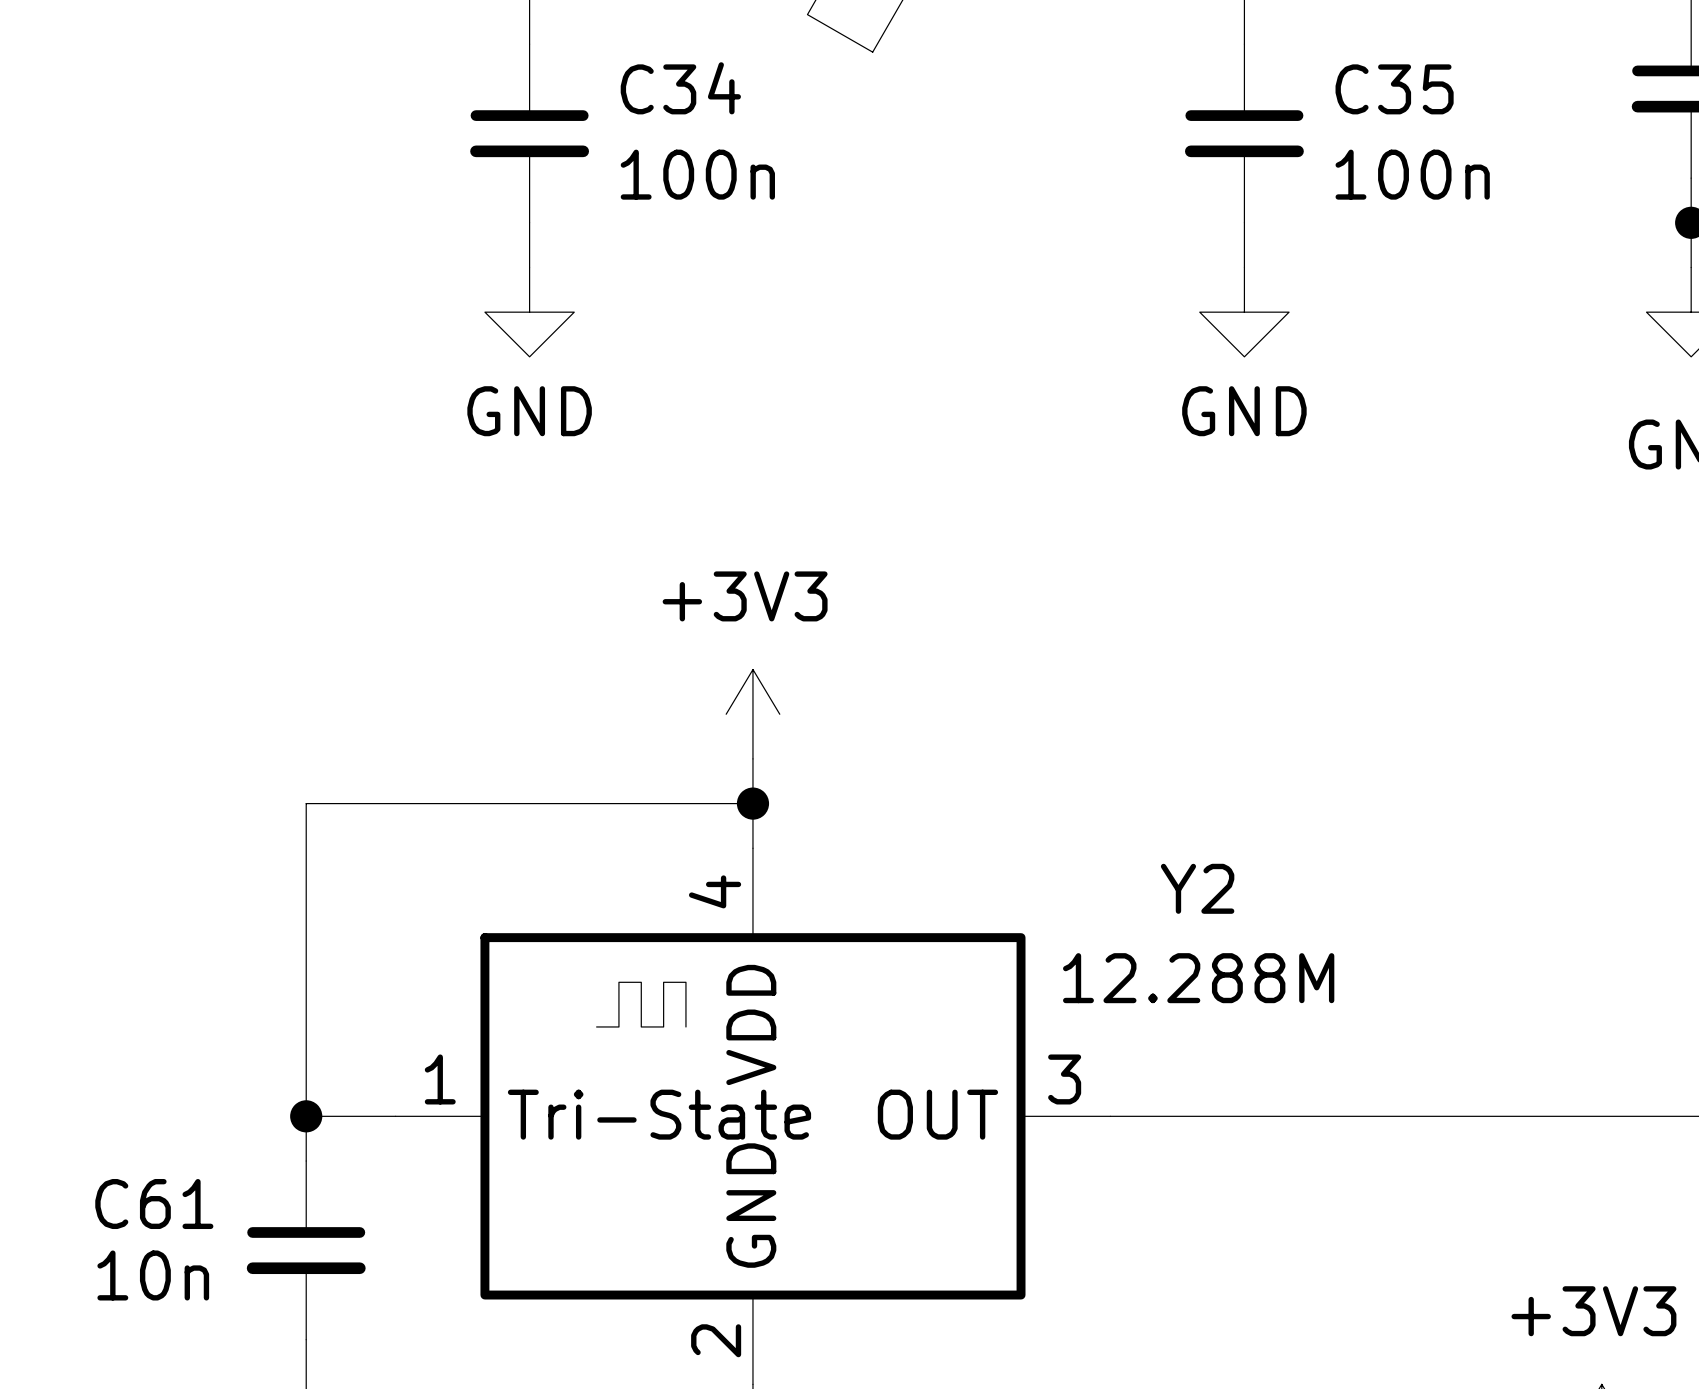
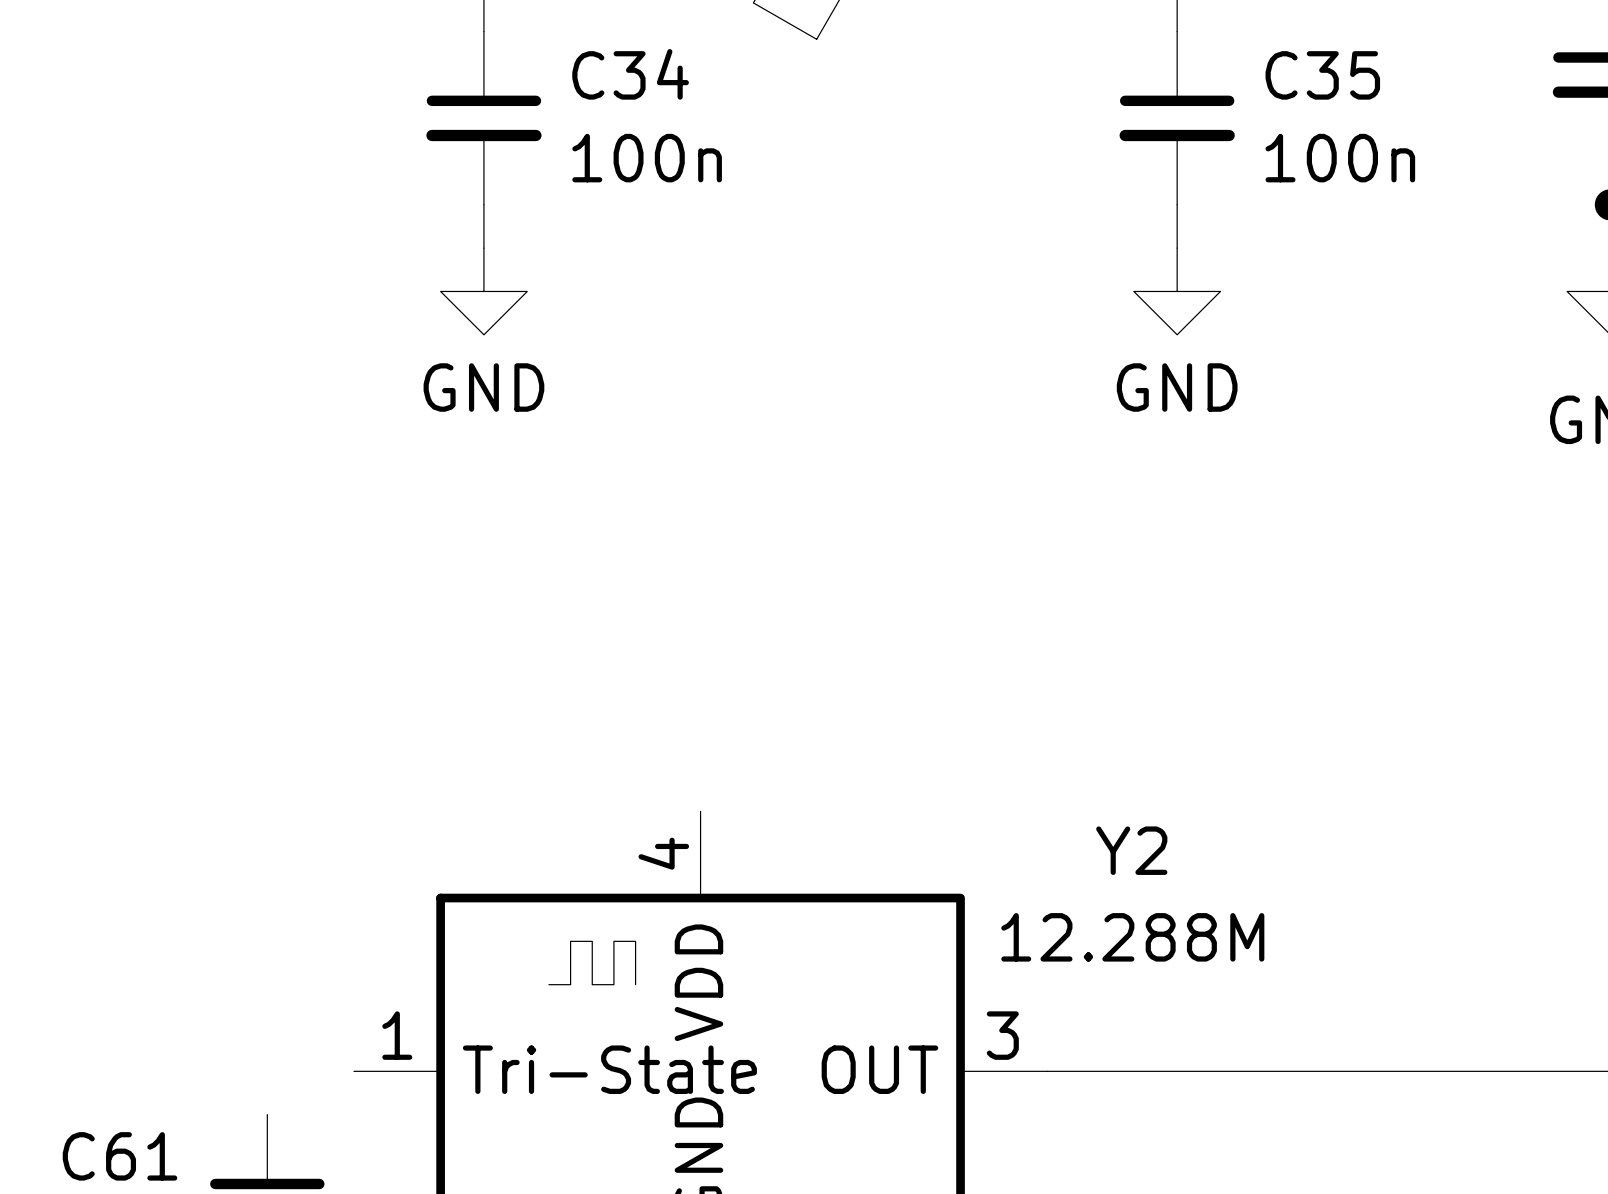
power symbol: +3V3 (752, 714) -> none
wire: (752, 758) (752, 848) -> none
wire: (752, 803) (306, 803) (306, 1161) -> none
junction: (752, 803) -> none
wire: (306, 1116) (395, 1116) -> none
junction: (306, 1116) -> none

